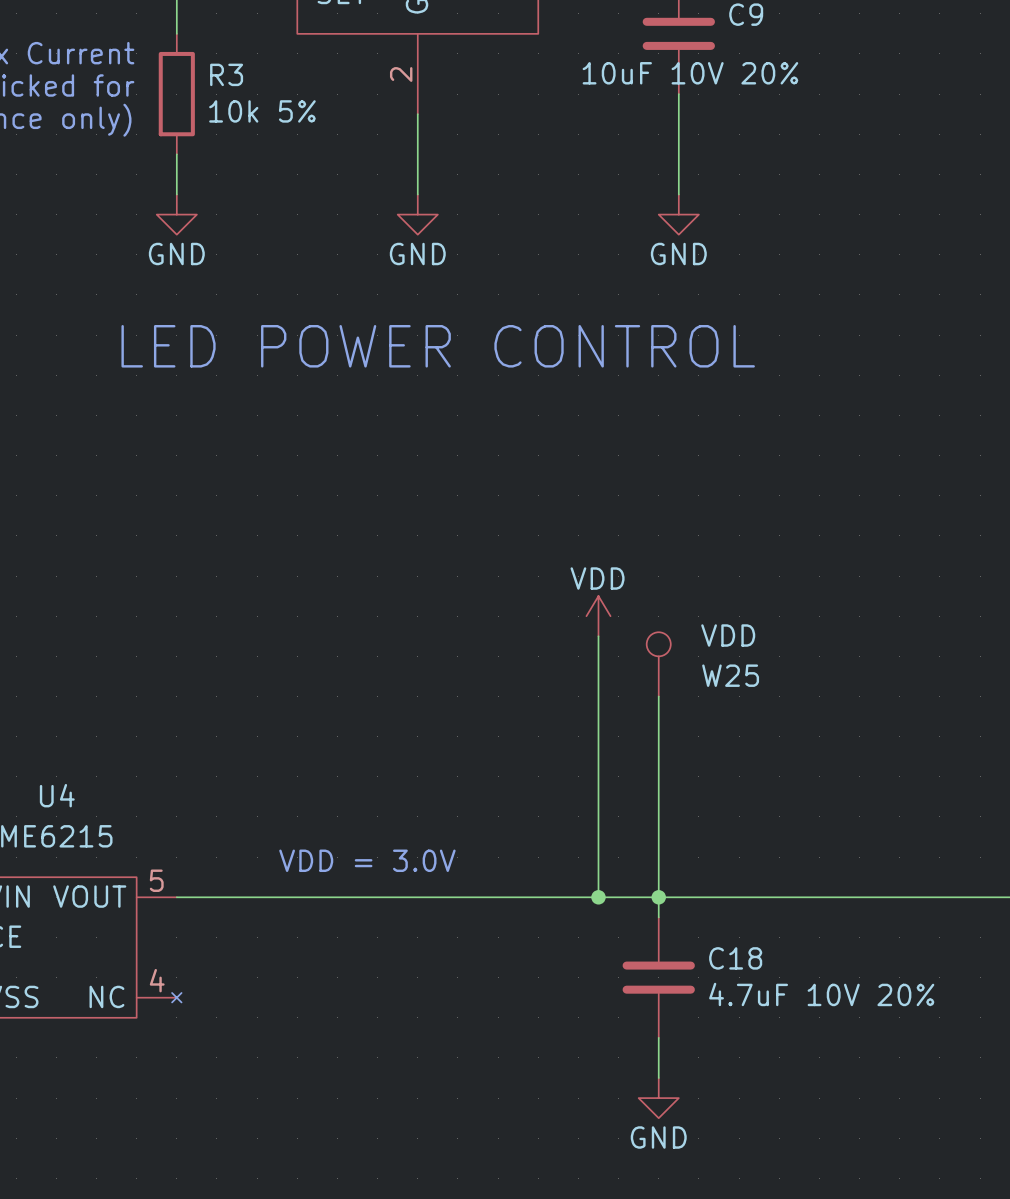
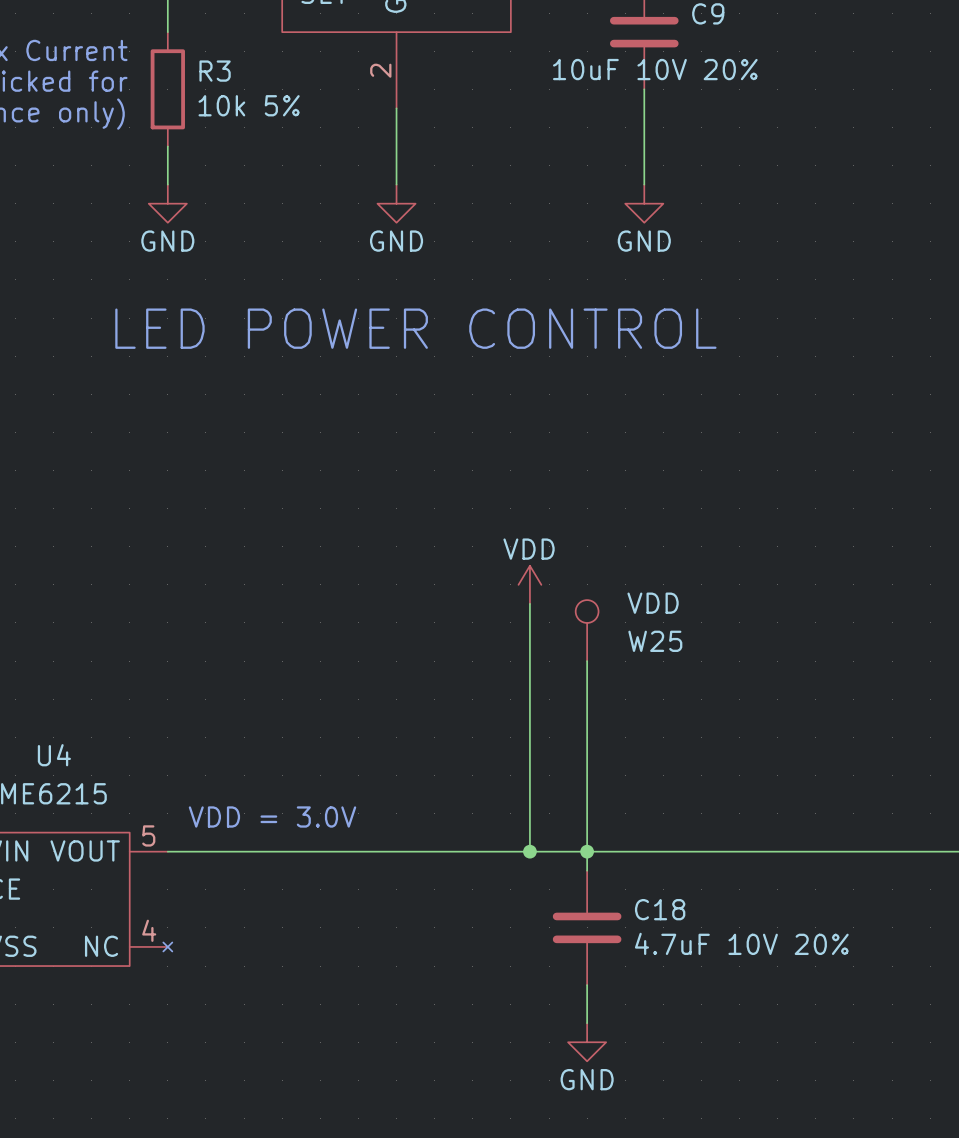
power symbol position: VDD (598, 616) -> VDD (529, 584)
wire: (598, 636) (598, 897) -> (529, 603) (529, 851)
W25 position: (658, 664) -> (587, 630)
wire: (658, 696) (658, 917) -> (587, 661) (587, 870)
text position: VDD = 3.0V (367, 860) -> VDD = 3.0V (272, 817)
junction: none -> (529, 851)
junction: (598, 897) -> none
junction: none -> (587, 851)
junction: (658, 897) -> none
C18 position: (658, 977) -> (587, 927)
wire: (658, 1037) (658, 1078) -> (587, 985) (587, 1023)
power symbol position: GND (658, 1098) -> GND (587, 1042)

